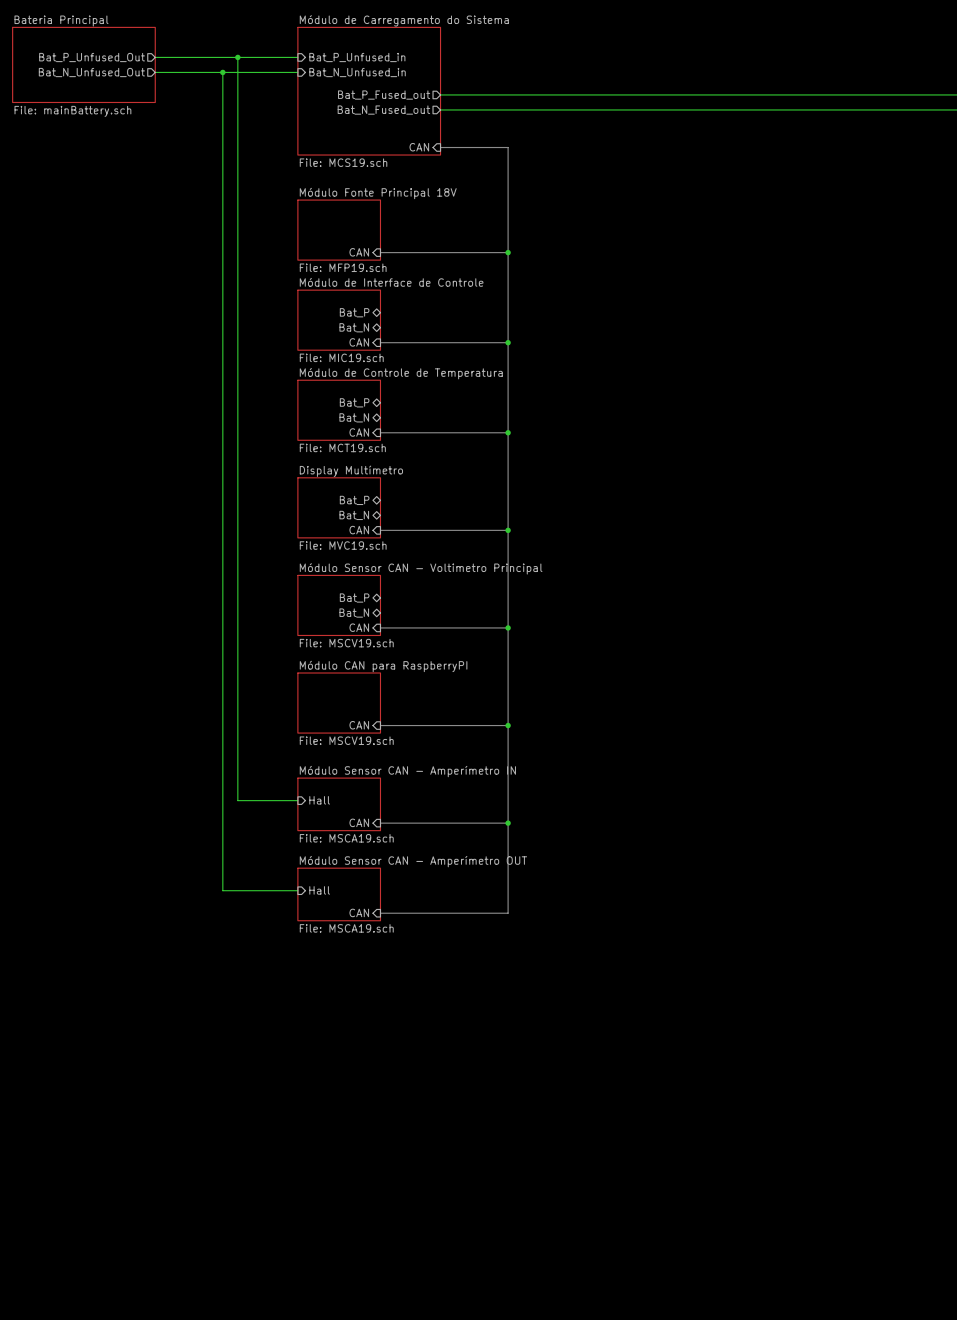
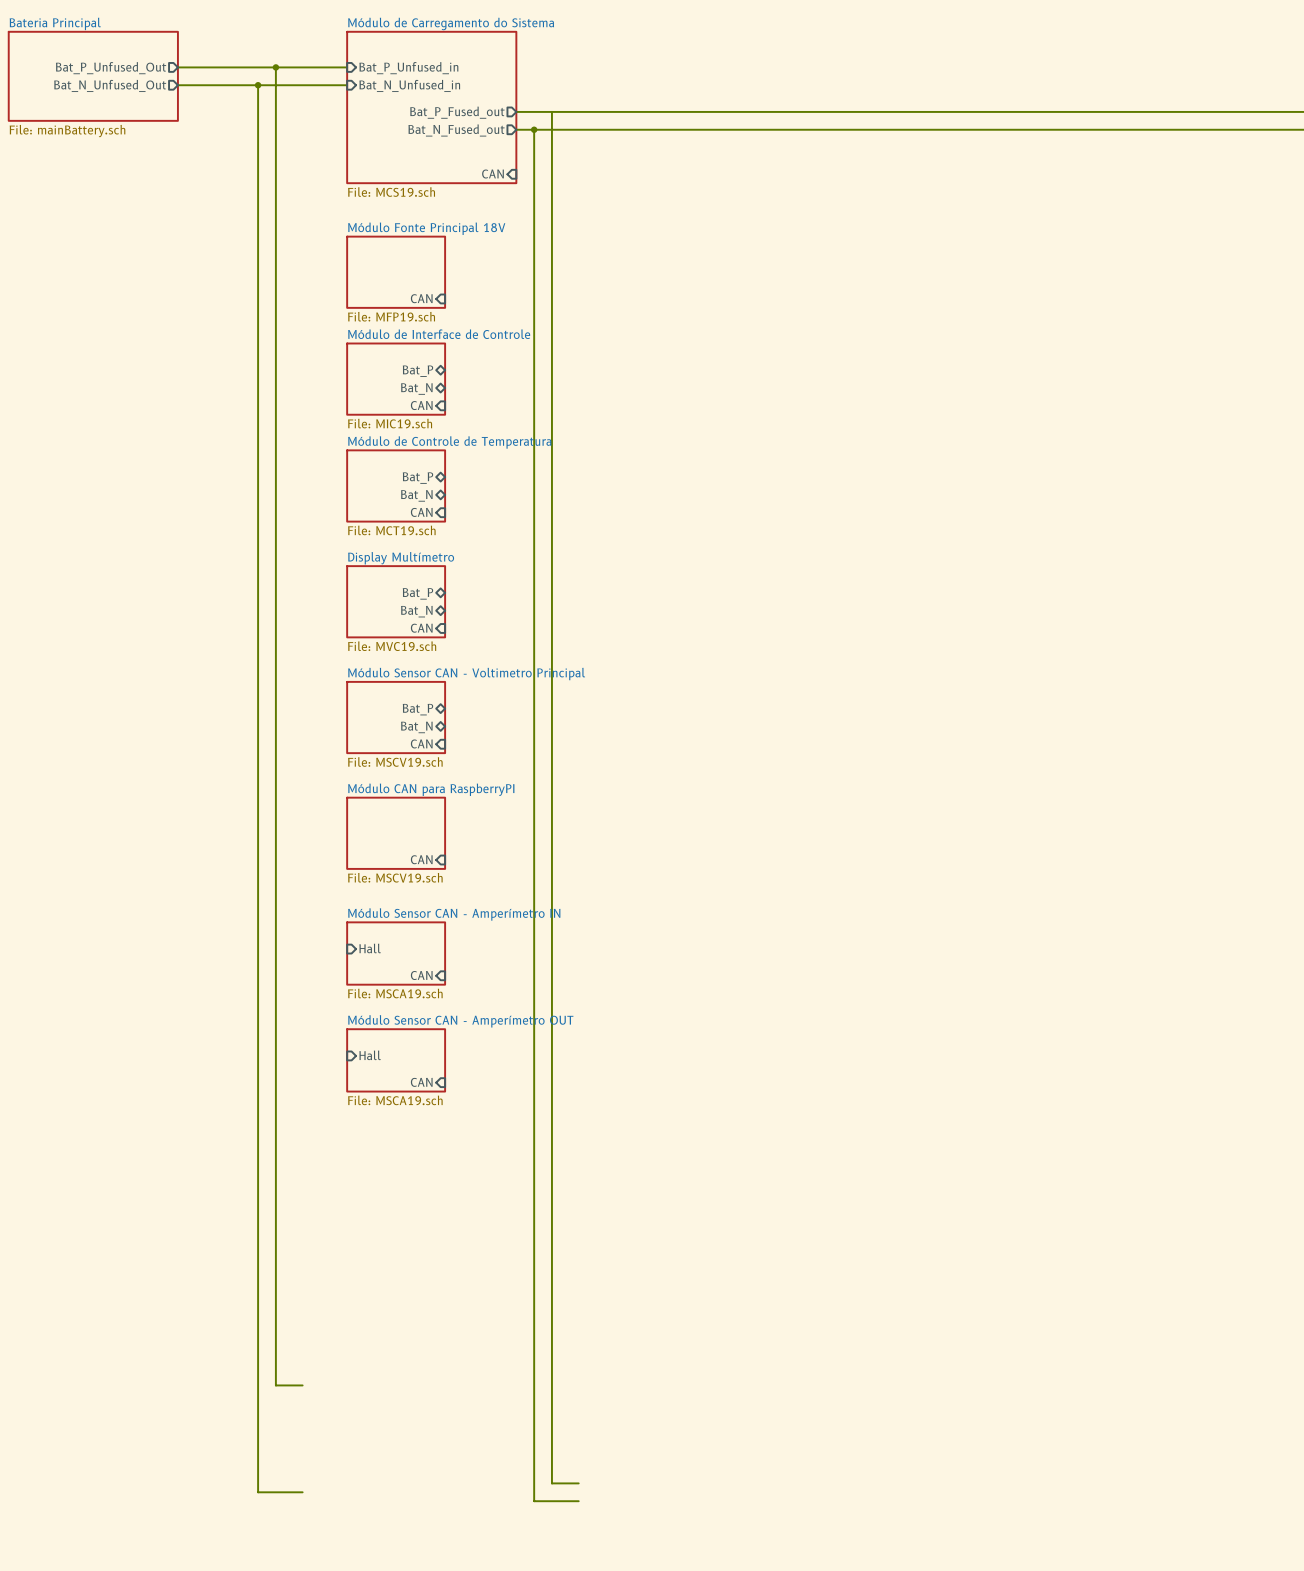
wire: none -> (551, 111) (551, 1483) (578, 1483)
wire: none -> (534, 129) (534, 1501) (578, 1501)
junction: none -> (534, 129)
bus: (440, 147) (508, 147) (508, 913) (380, 913) -> none
bus: (380, 252) (508, 252) -> none
junction: (508, 252) -> none
bus: (380, 342) (508, 342) -> none
junction: (508, 342) -> none
bus: (380, 432) (508, 432) -> none
junction: (508, 432) -> none
bus: (380, 530) (508, 530) -> none
junction: (508, 530) -> none
bus: (380, 627) (508, 627) -> none
junction: (508, 627) -> none
bus: (380, 725) (508, 725) -> none
junction: (508, 725) -> none
wire: (237, 800) (297, 800) -> (275, 949) (275, 1385) (302, 1385)
bus: (380, 823) (508, 823) -> none
junction: (508, 823) -> none
wire: (222, 890) (297, 890) -> (258, 1055) (258, 1492) (302, 1492)

